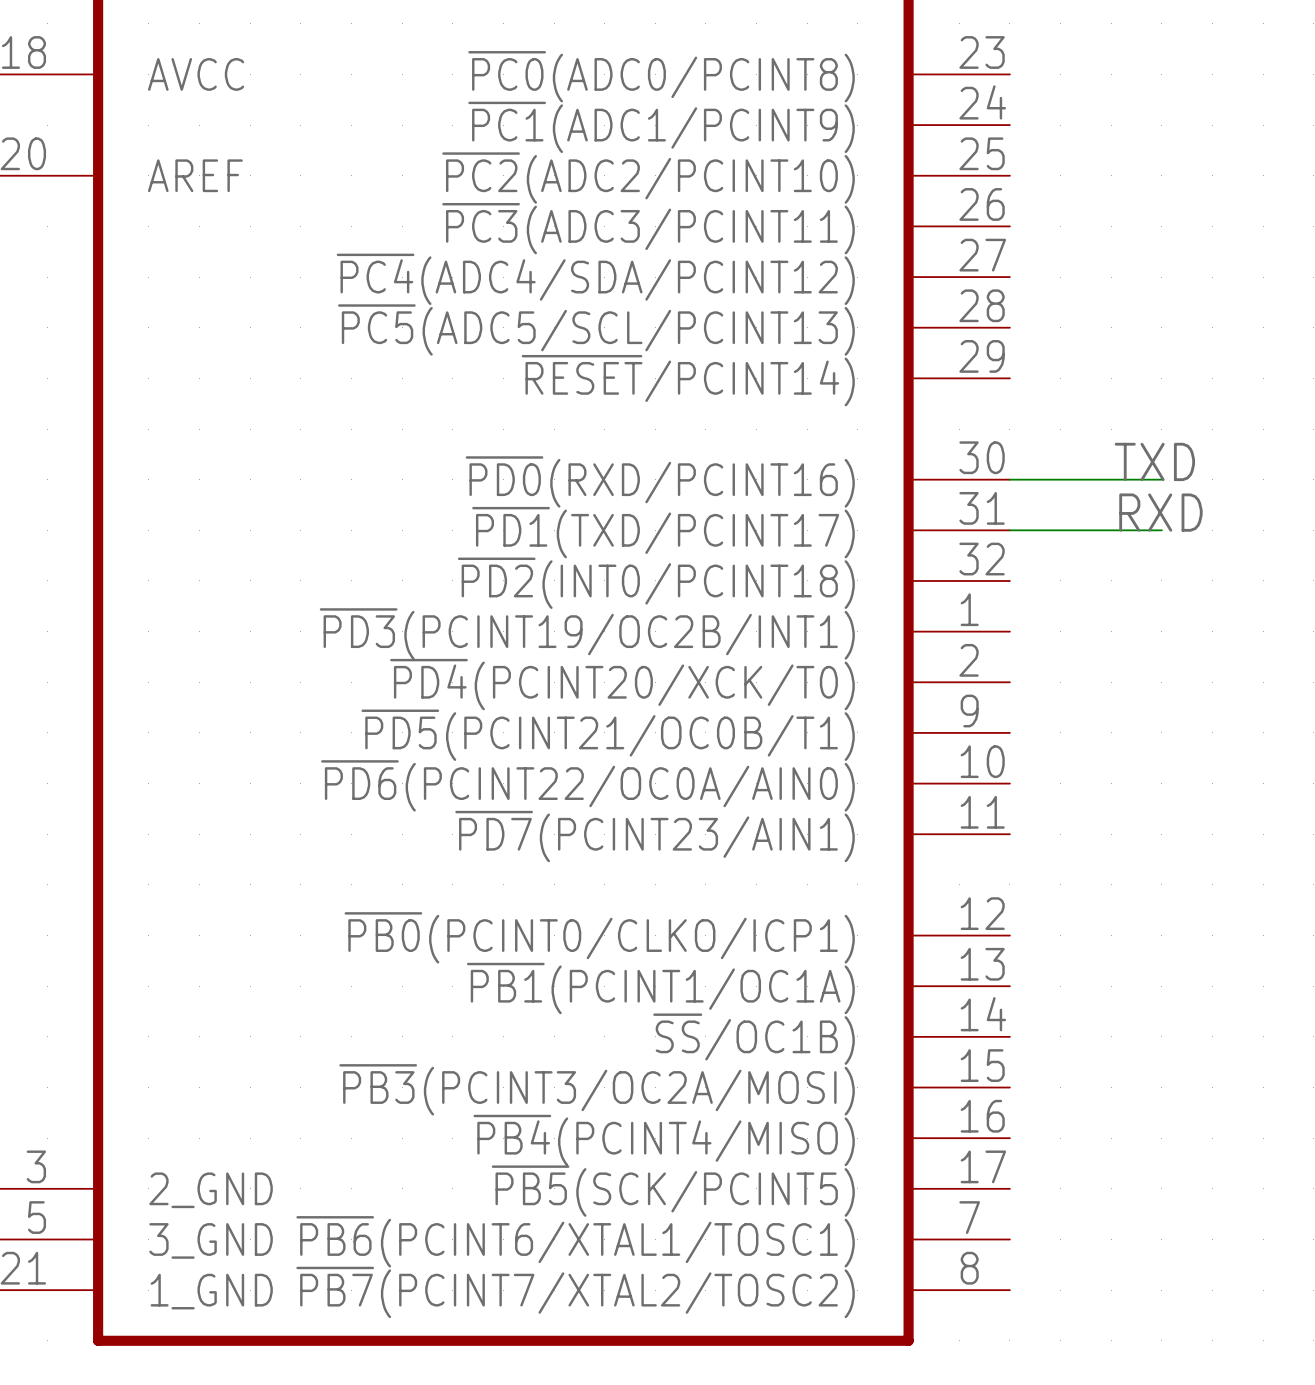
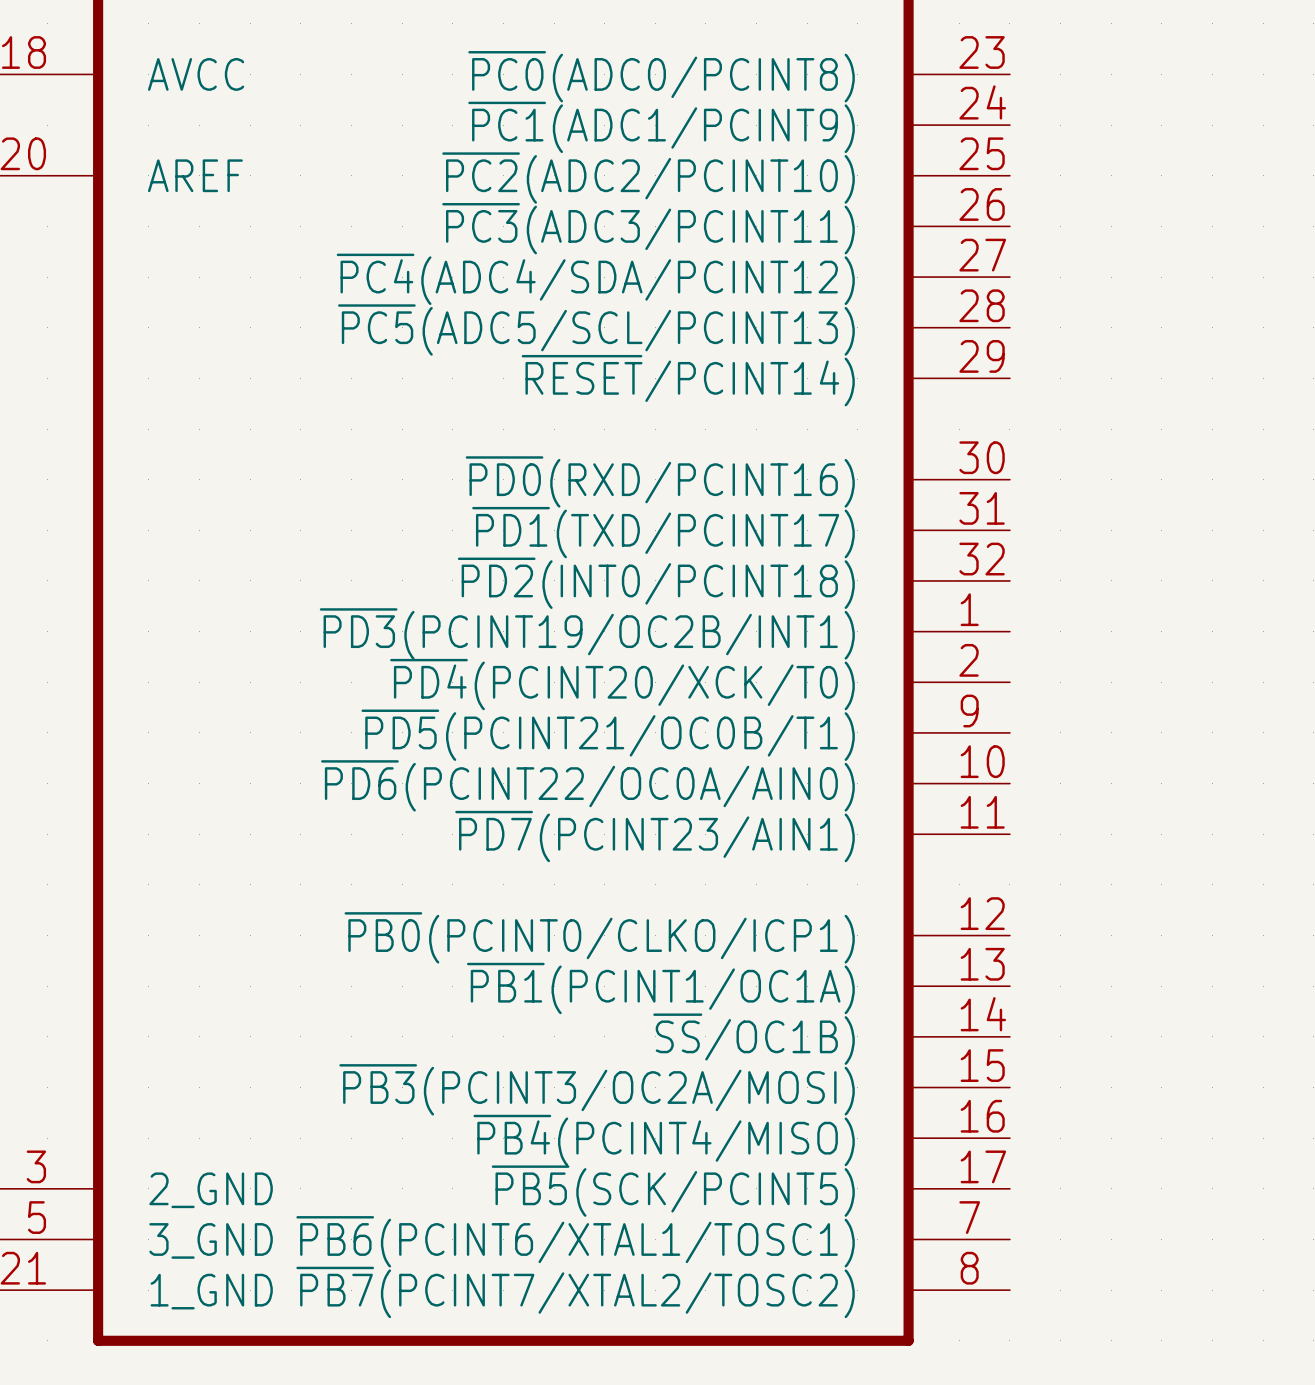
label: TXD (1154, 461) -> none
wire: (1009, 479) (1161, 479) -> none
label: RXD (1160, 512) -> none
wire: (1009, 530) (1161, 530) -> none

